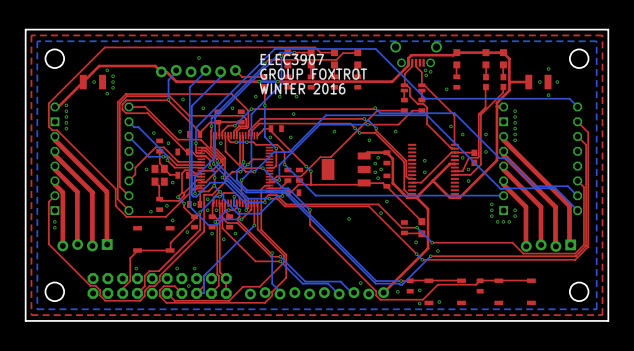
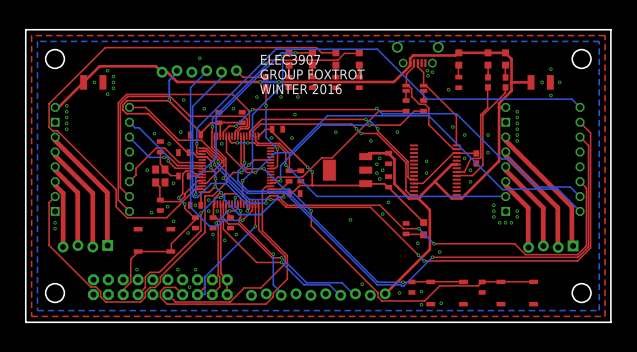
top track: none -> (255, 136) (258, 143) (279, 143) (289, 153) (289, 170) (300, 170)

